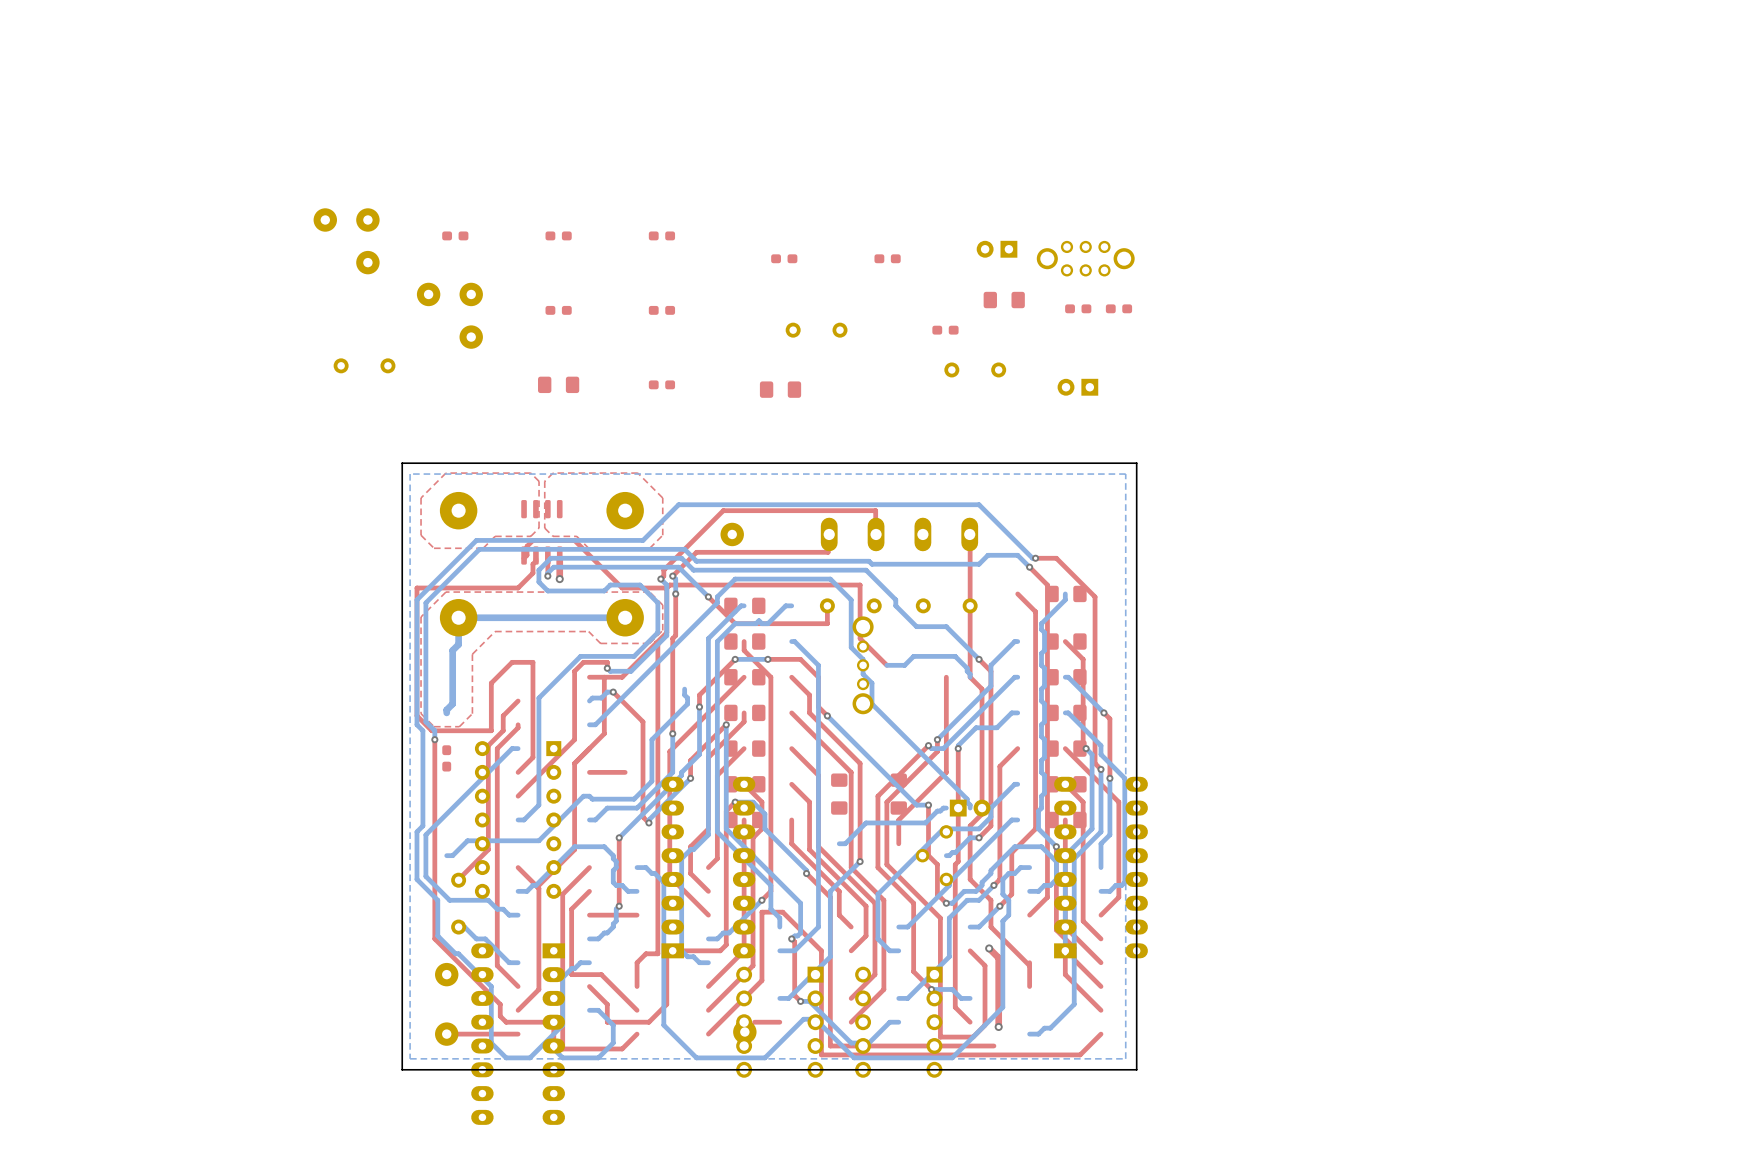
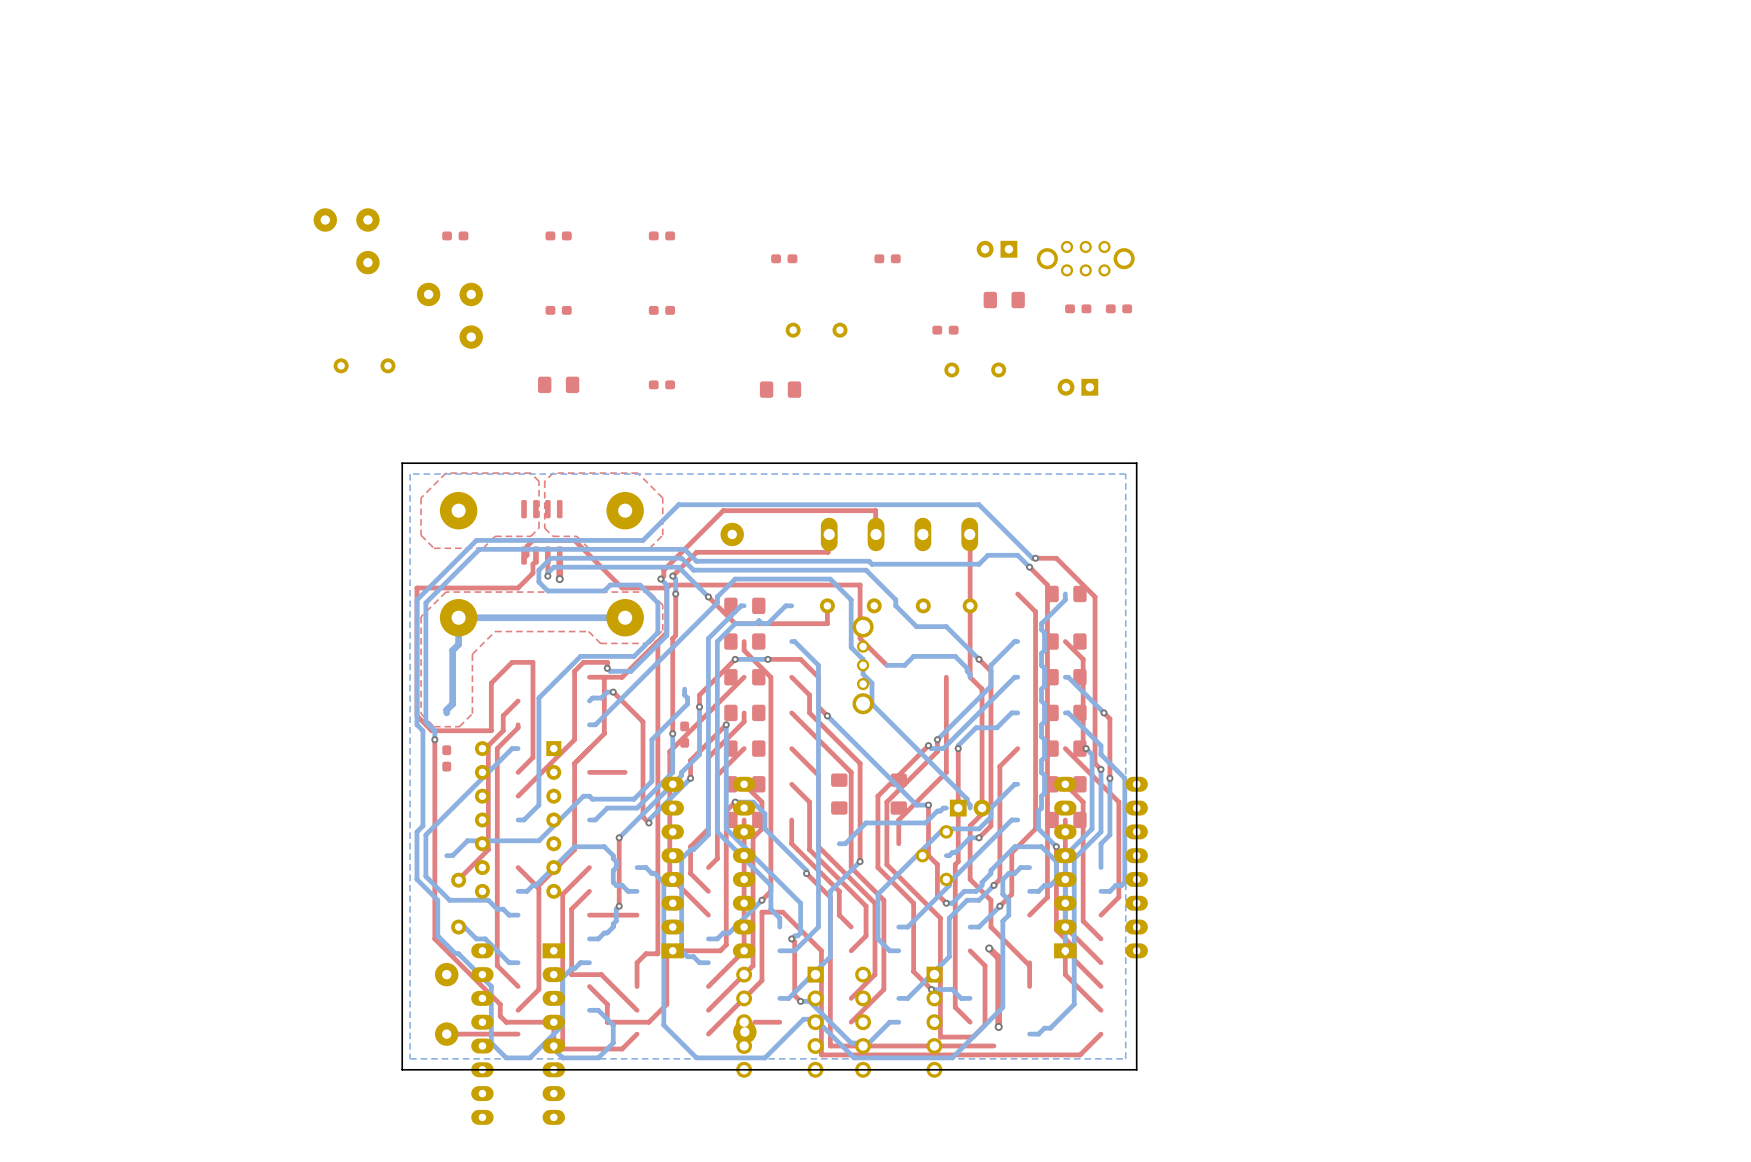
part: none -> (684, 734)

